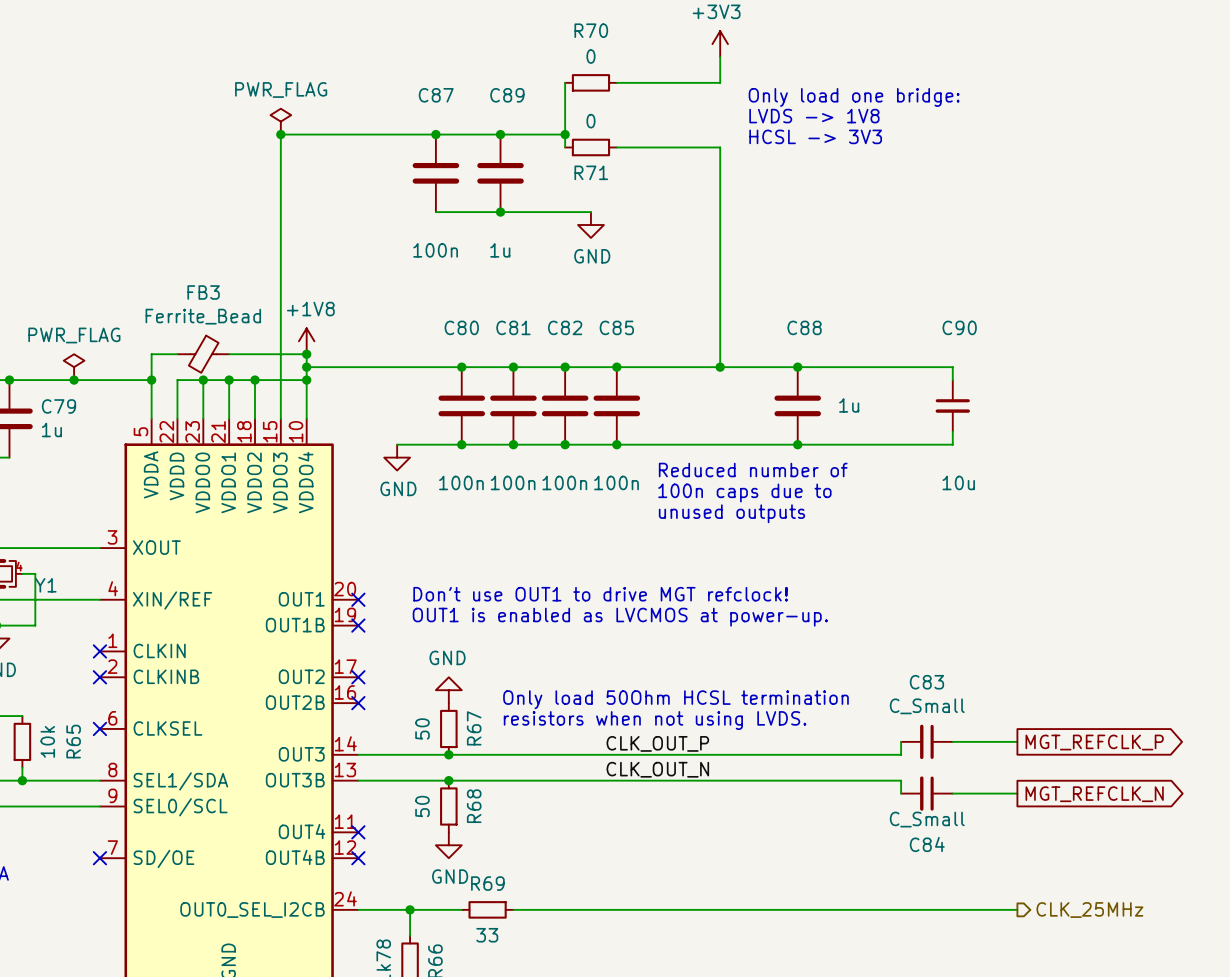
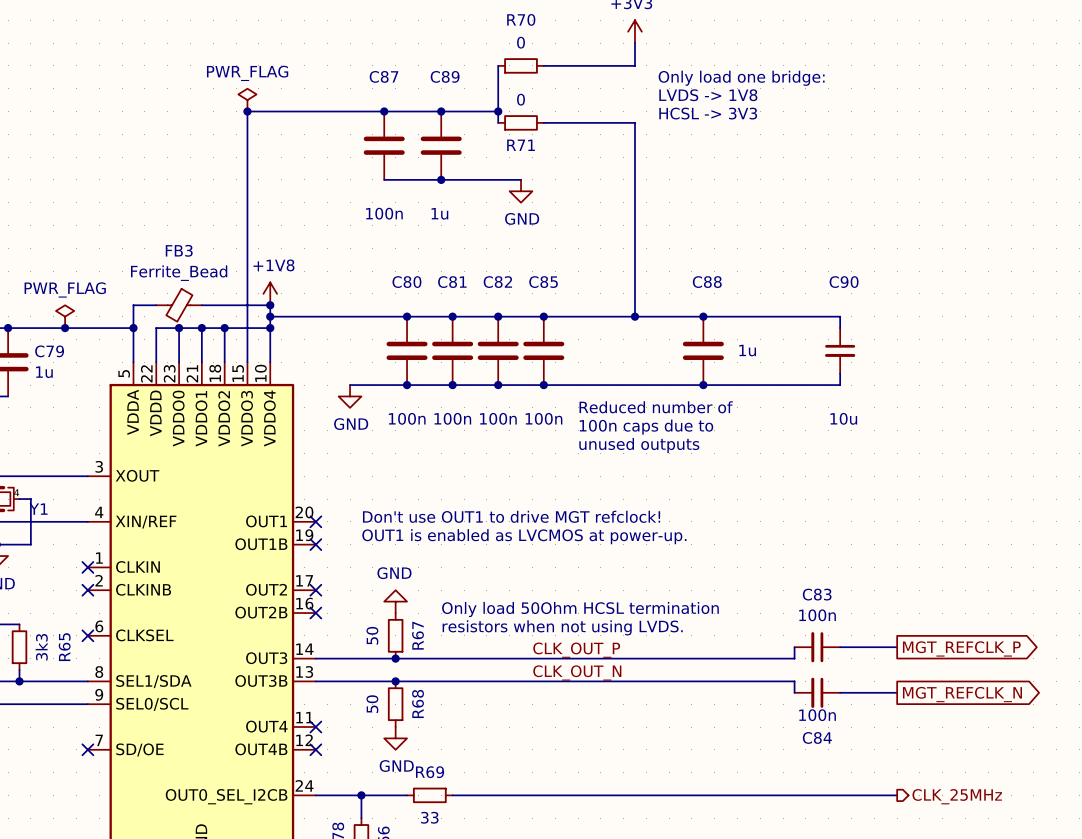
C83 value: C_Small (927, 706) -> 100n (817, 615)
R65 value: 10k (47, 741) -> 3k3 (41, 647)
C84 value: C_Small (927, 819) -> 100n (817, 715)

